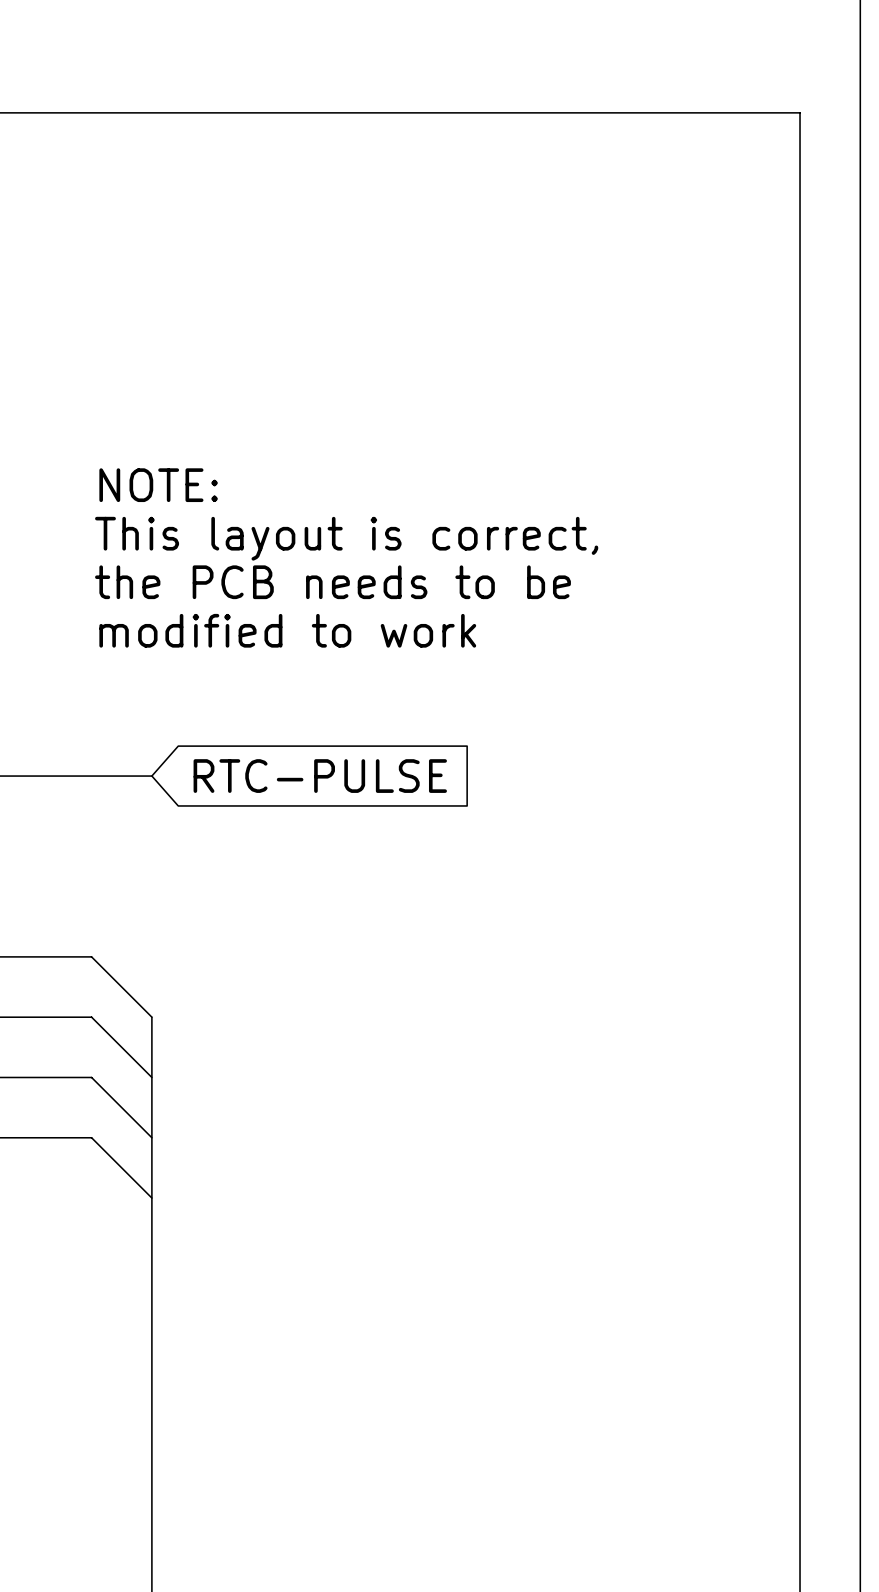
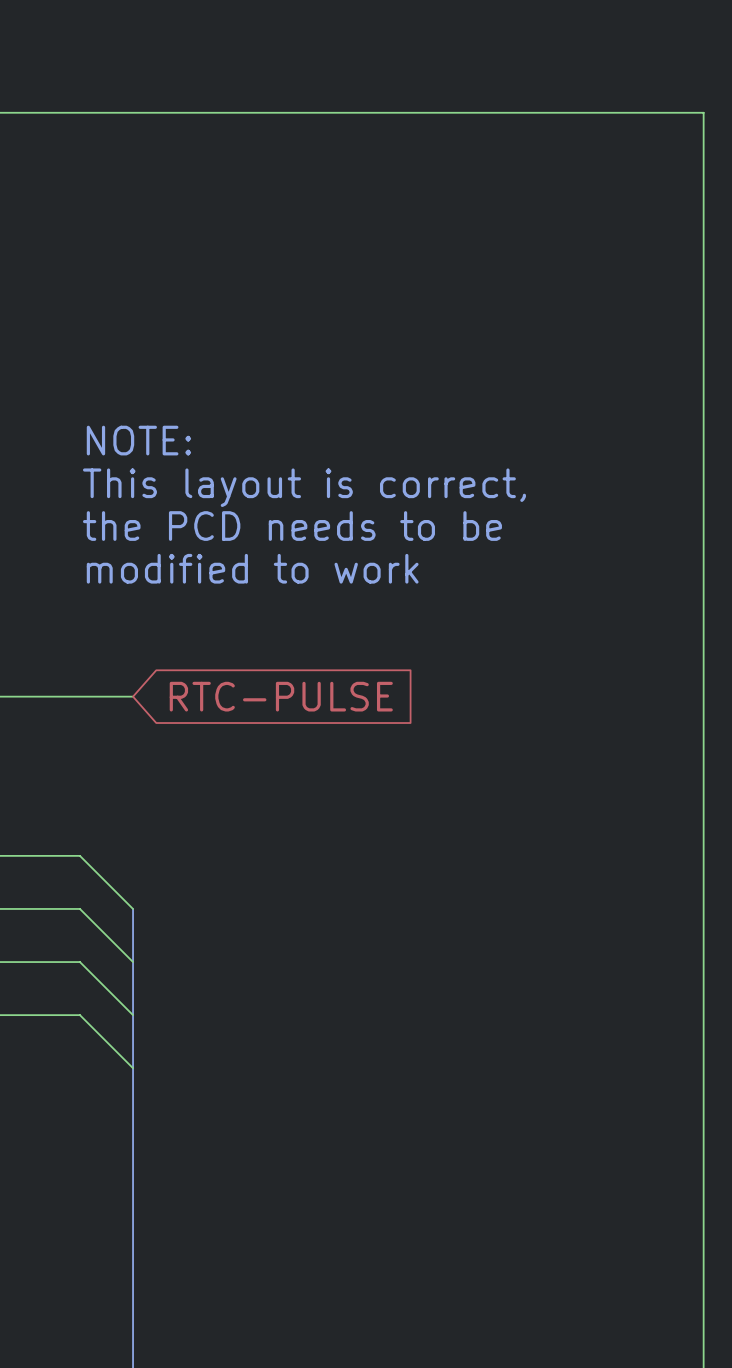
text: the PCB needs to be (333, 582) -> the PCD needs to be (292, 526)

